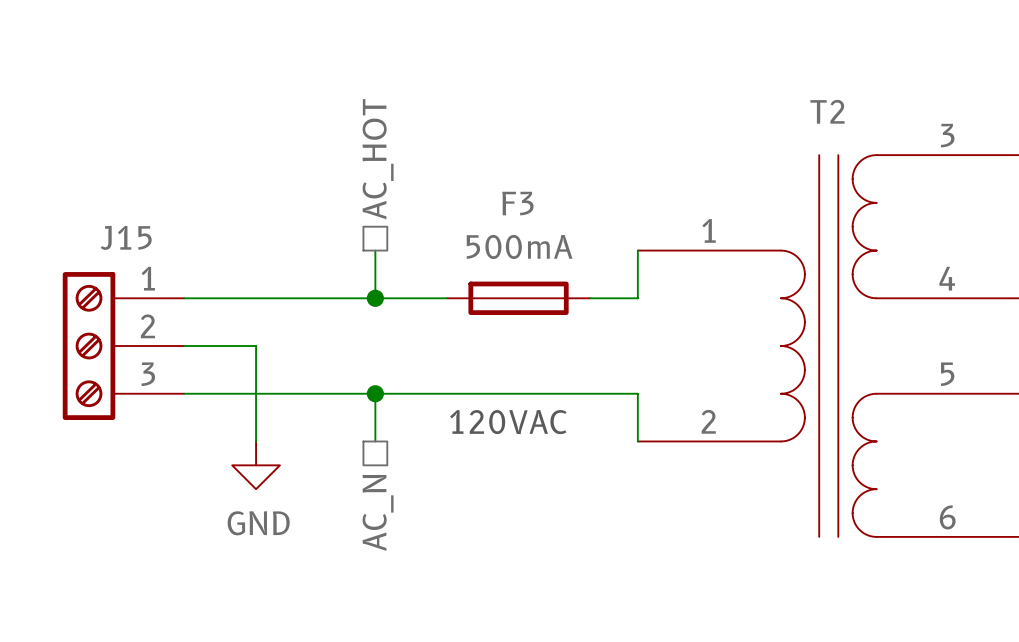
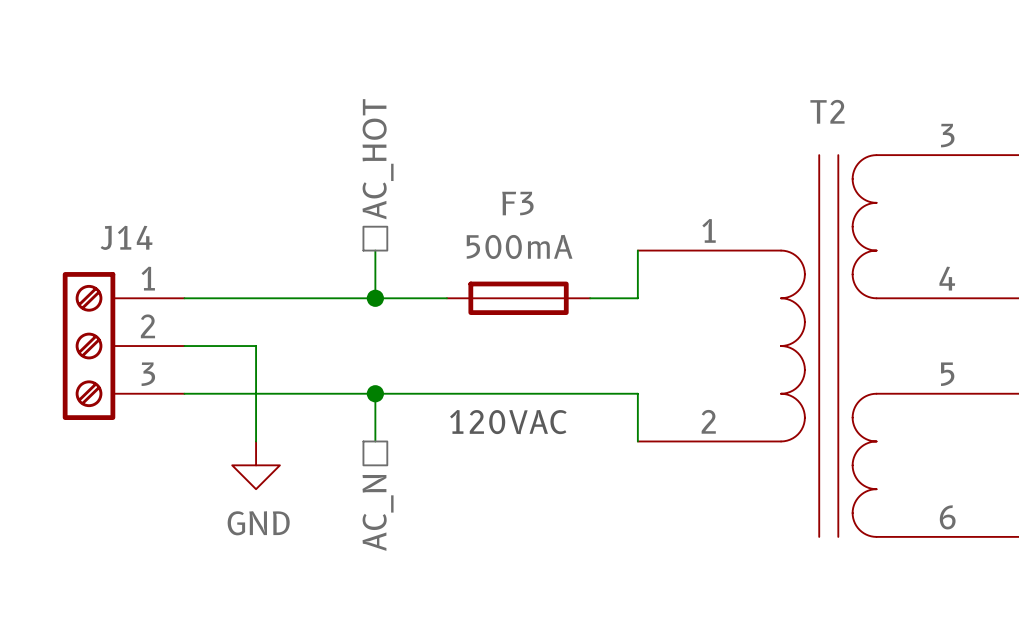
J15 name: J15 (126, 237) -> J14 (126, 237)

